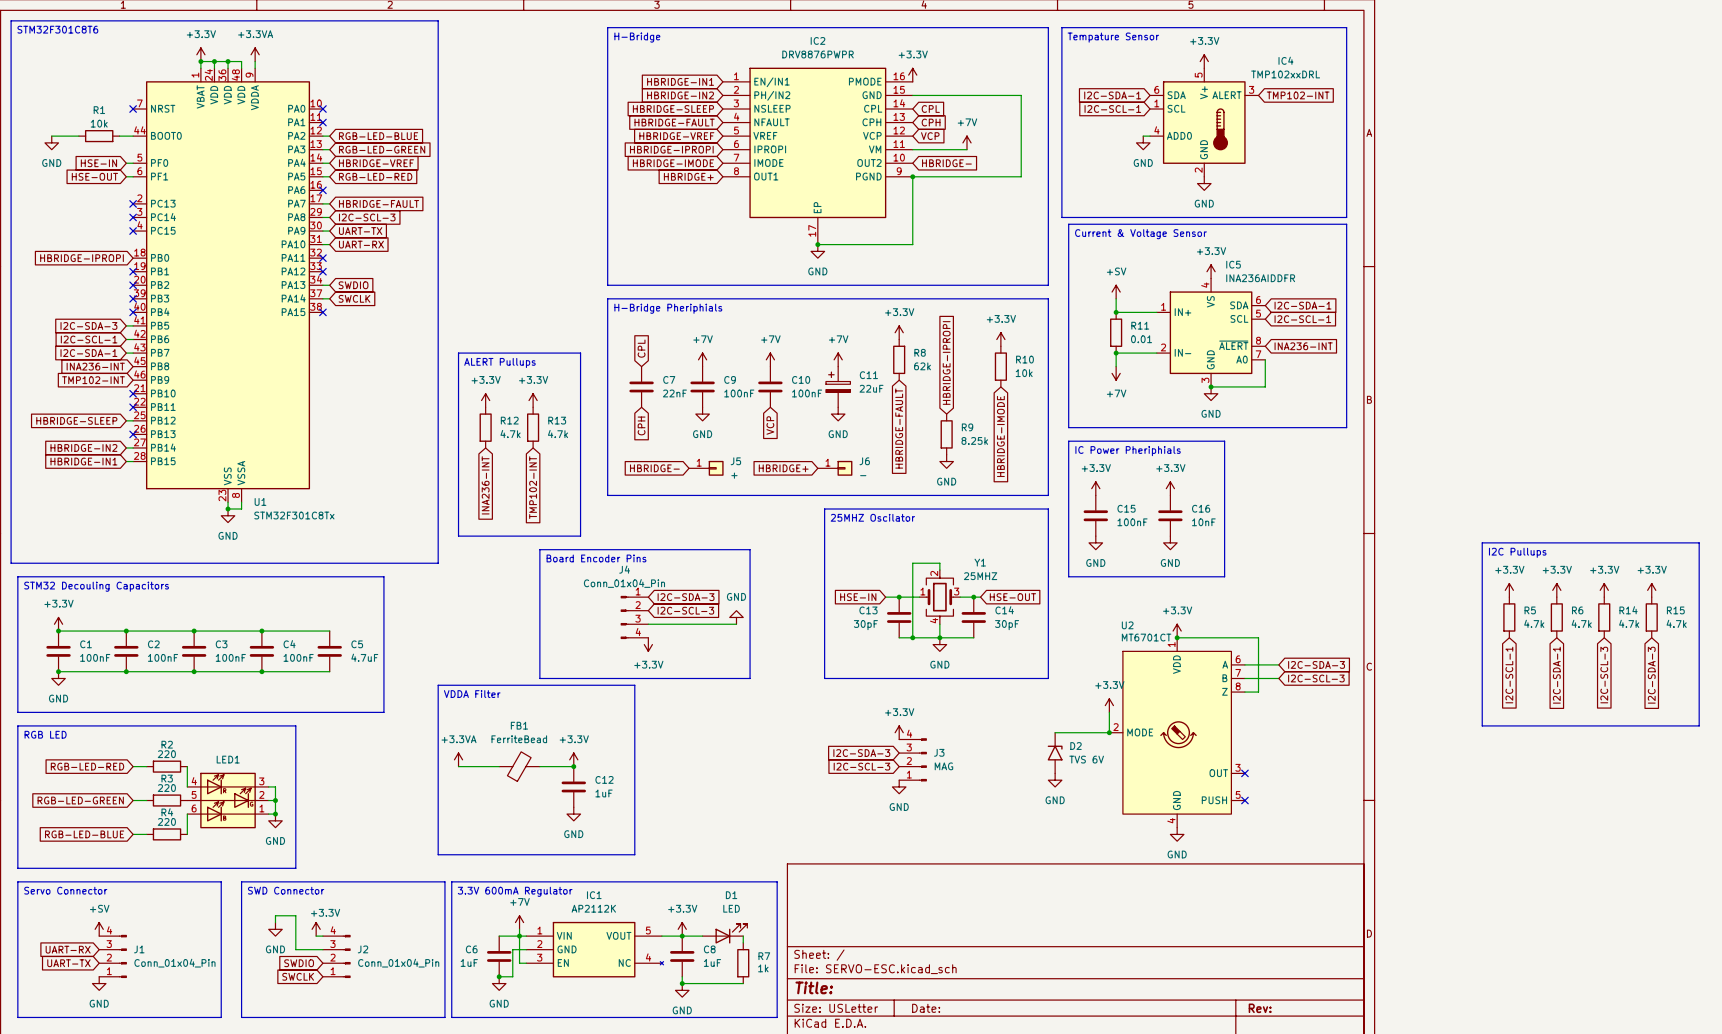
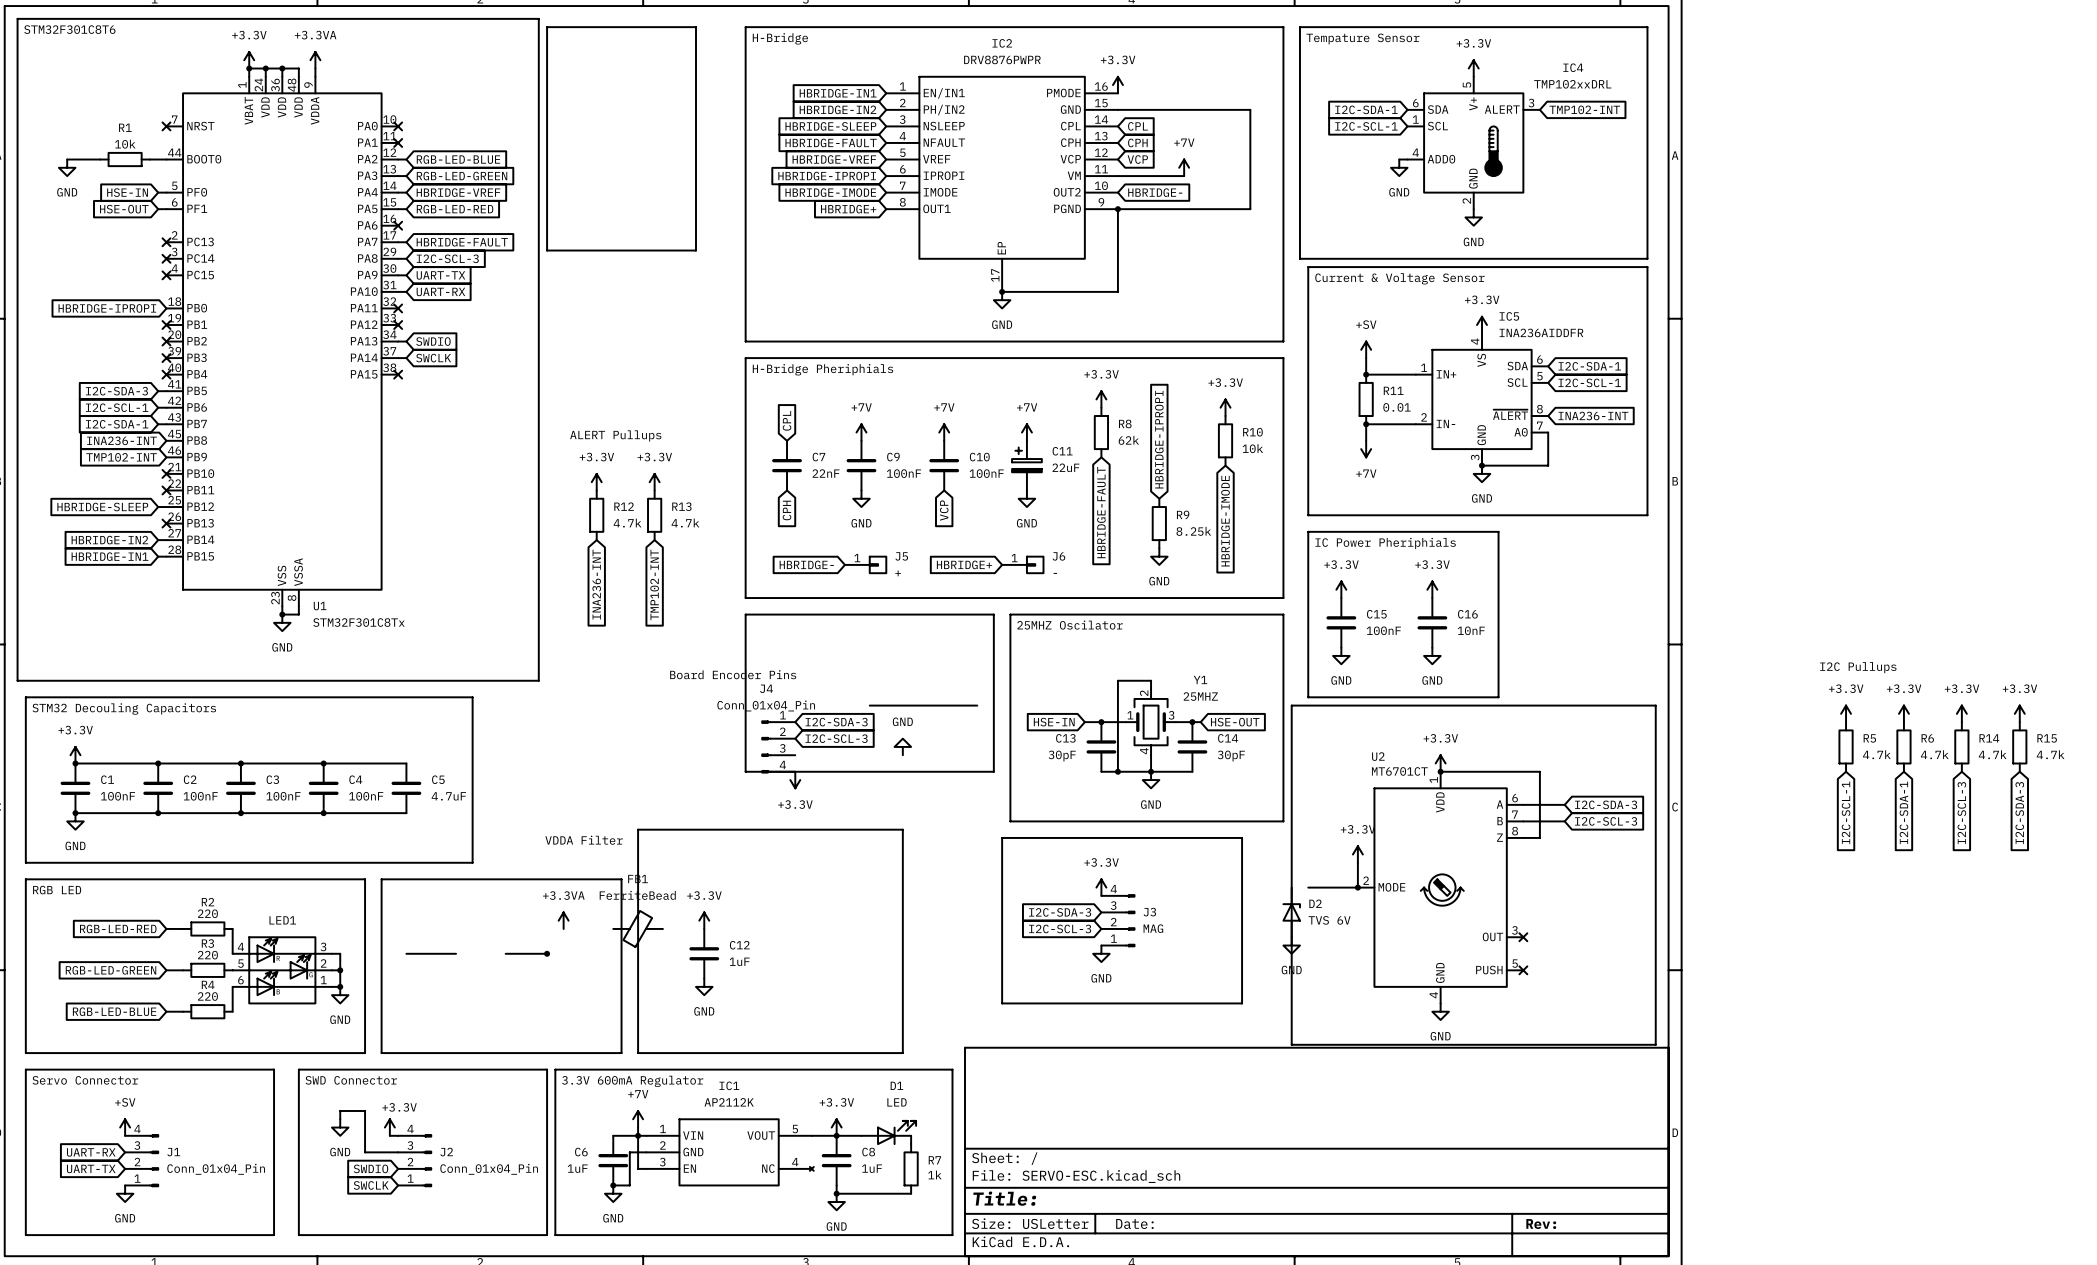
line: none -> (547, 27) (696, 27) (696, 250) (547, 250) (547, 27)
line: (458, 353) (580, 353) (580, 536) (458, 536) (458, 353) -> none
line: none -> (745, 614) (745, 771) (993, 771) (993, 614) (745, 614)
line: (1482, 542) (1699, 542) (1699, 725) (1482, 725) (1482, 542) -> none
line: (539, 549) (750, 549) (750, 678) (539, 678) (539, 549) -> none
line: none -> (1291, 705) (1655, 705) (1655, 1044) (1291, 1044) (1291, 705)
wire: (648, 624) (736, 624) -> (869, 705) (977, 705)
line: (519, 685) (438, 685) (438, 854) (634, 854) (634, 685) -> (638, 829) (638, 1053) (902, 1053) (902, 829) (778, 829)
line: none -> (1002, 837) (1242, 837) (1242, 1003) (1002, 1003) (1002, 837)
line: none -> (381, 879) (621, 879) (621, 1053) (381, 1053) (381, 879)
wire: (1055, 732) (1068, 732) -> none
wire: (458, 766) (499, 766) -> (406, 953) (456, 953)
wire: (539, 766) (573, 766) -> (505, 953) (547, 953)
junction: (573, 766) -> none
junction: none -> (547, 953)

